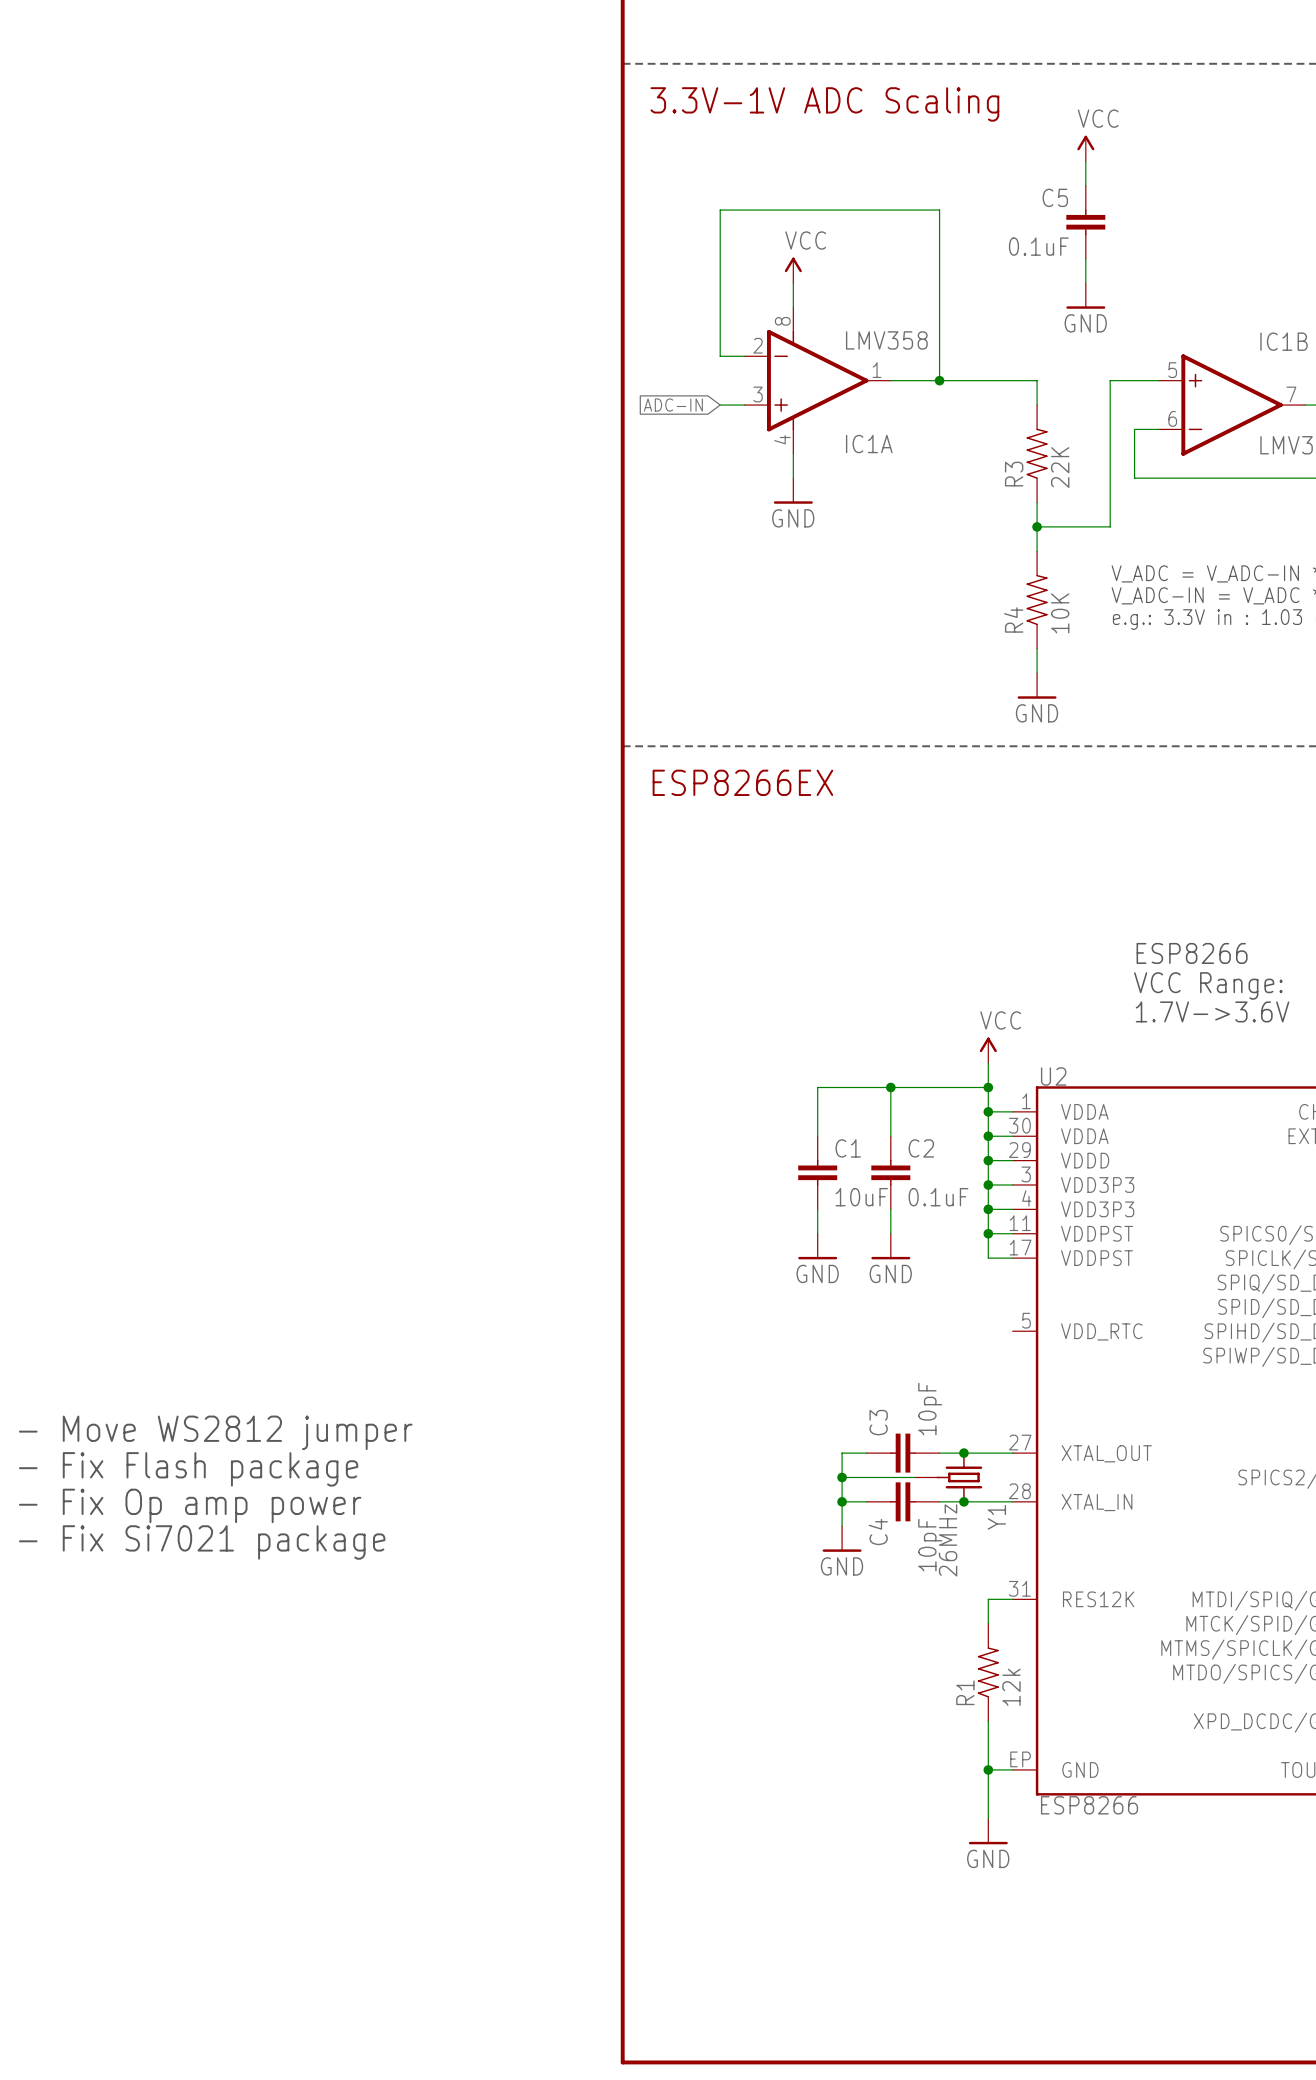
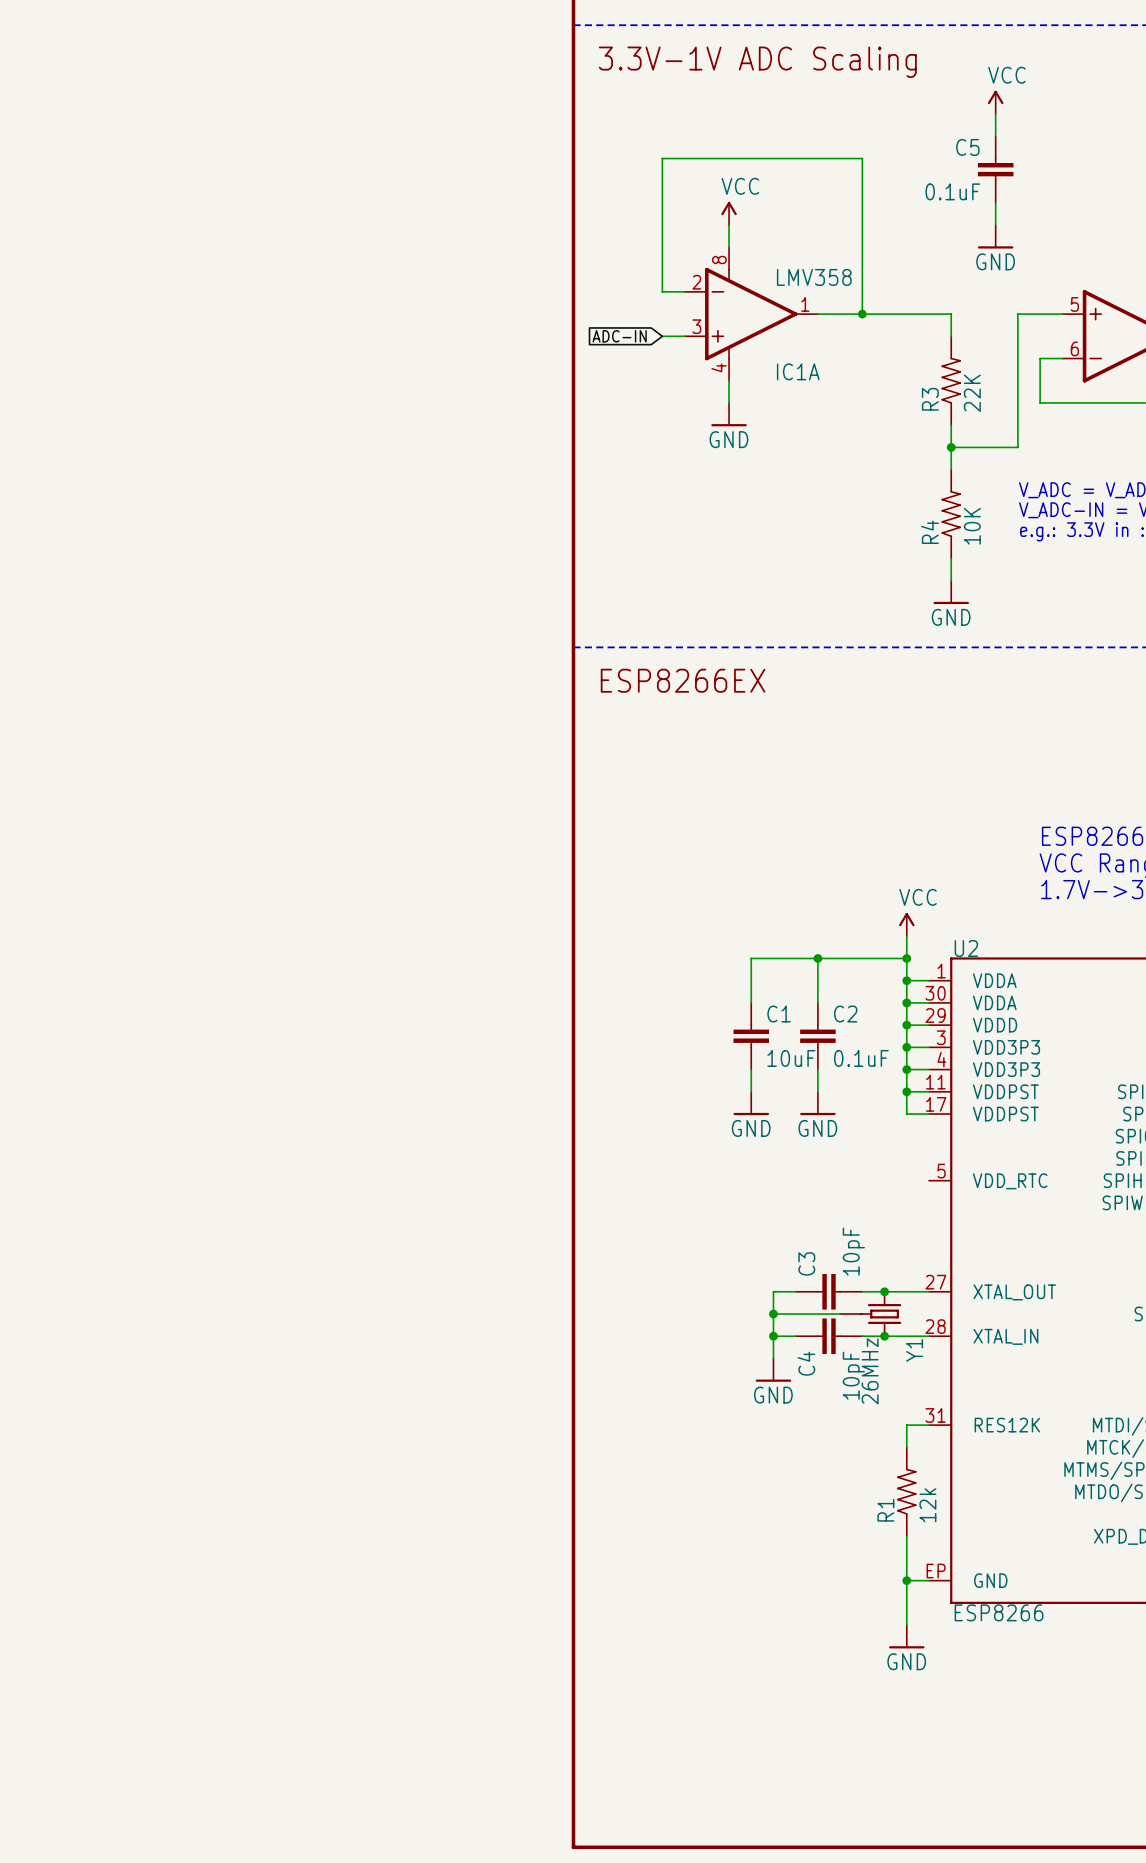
text: - Move WS2812 jumper (215, 1432) -> none
text: - Fix Flash package (188, 1469) -> none
text: - Fix Op amp power (190, 1505) -> none
text: - Fix Si7021 package (202, 1542) -> none

